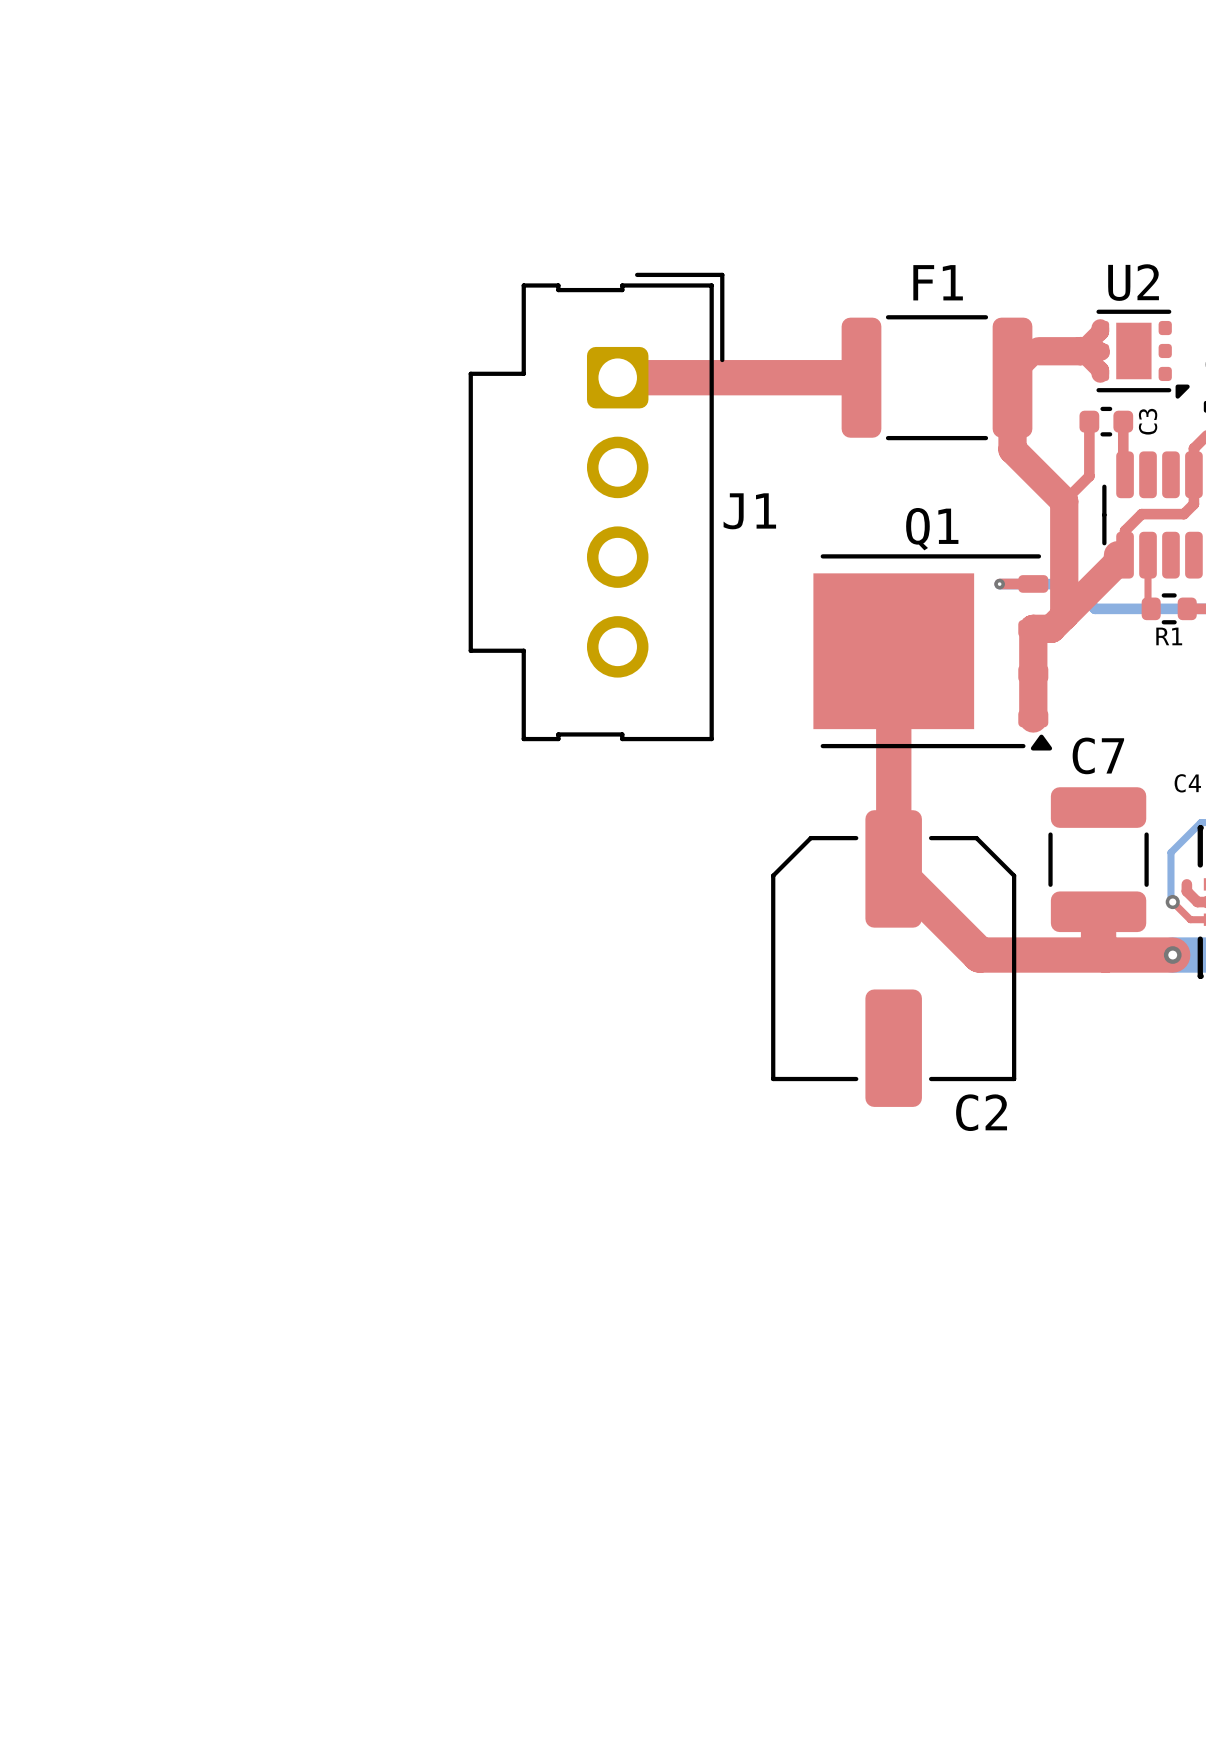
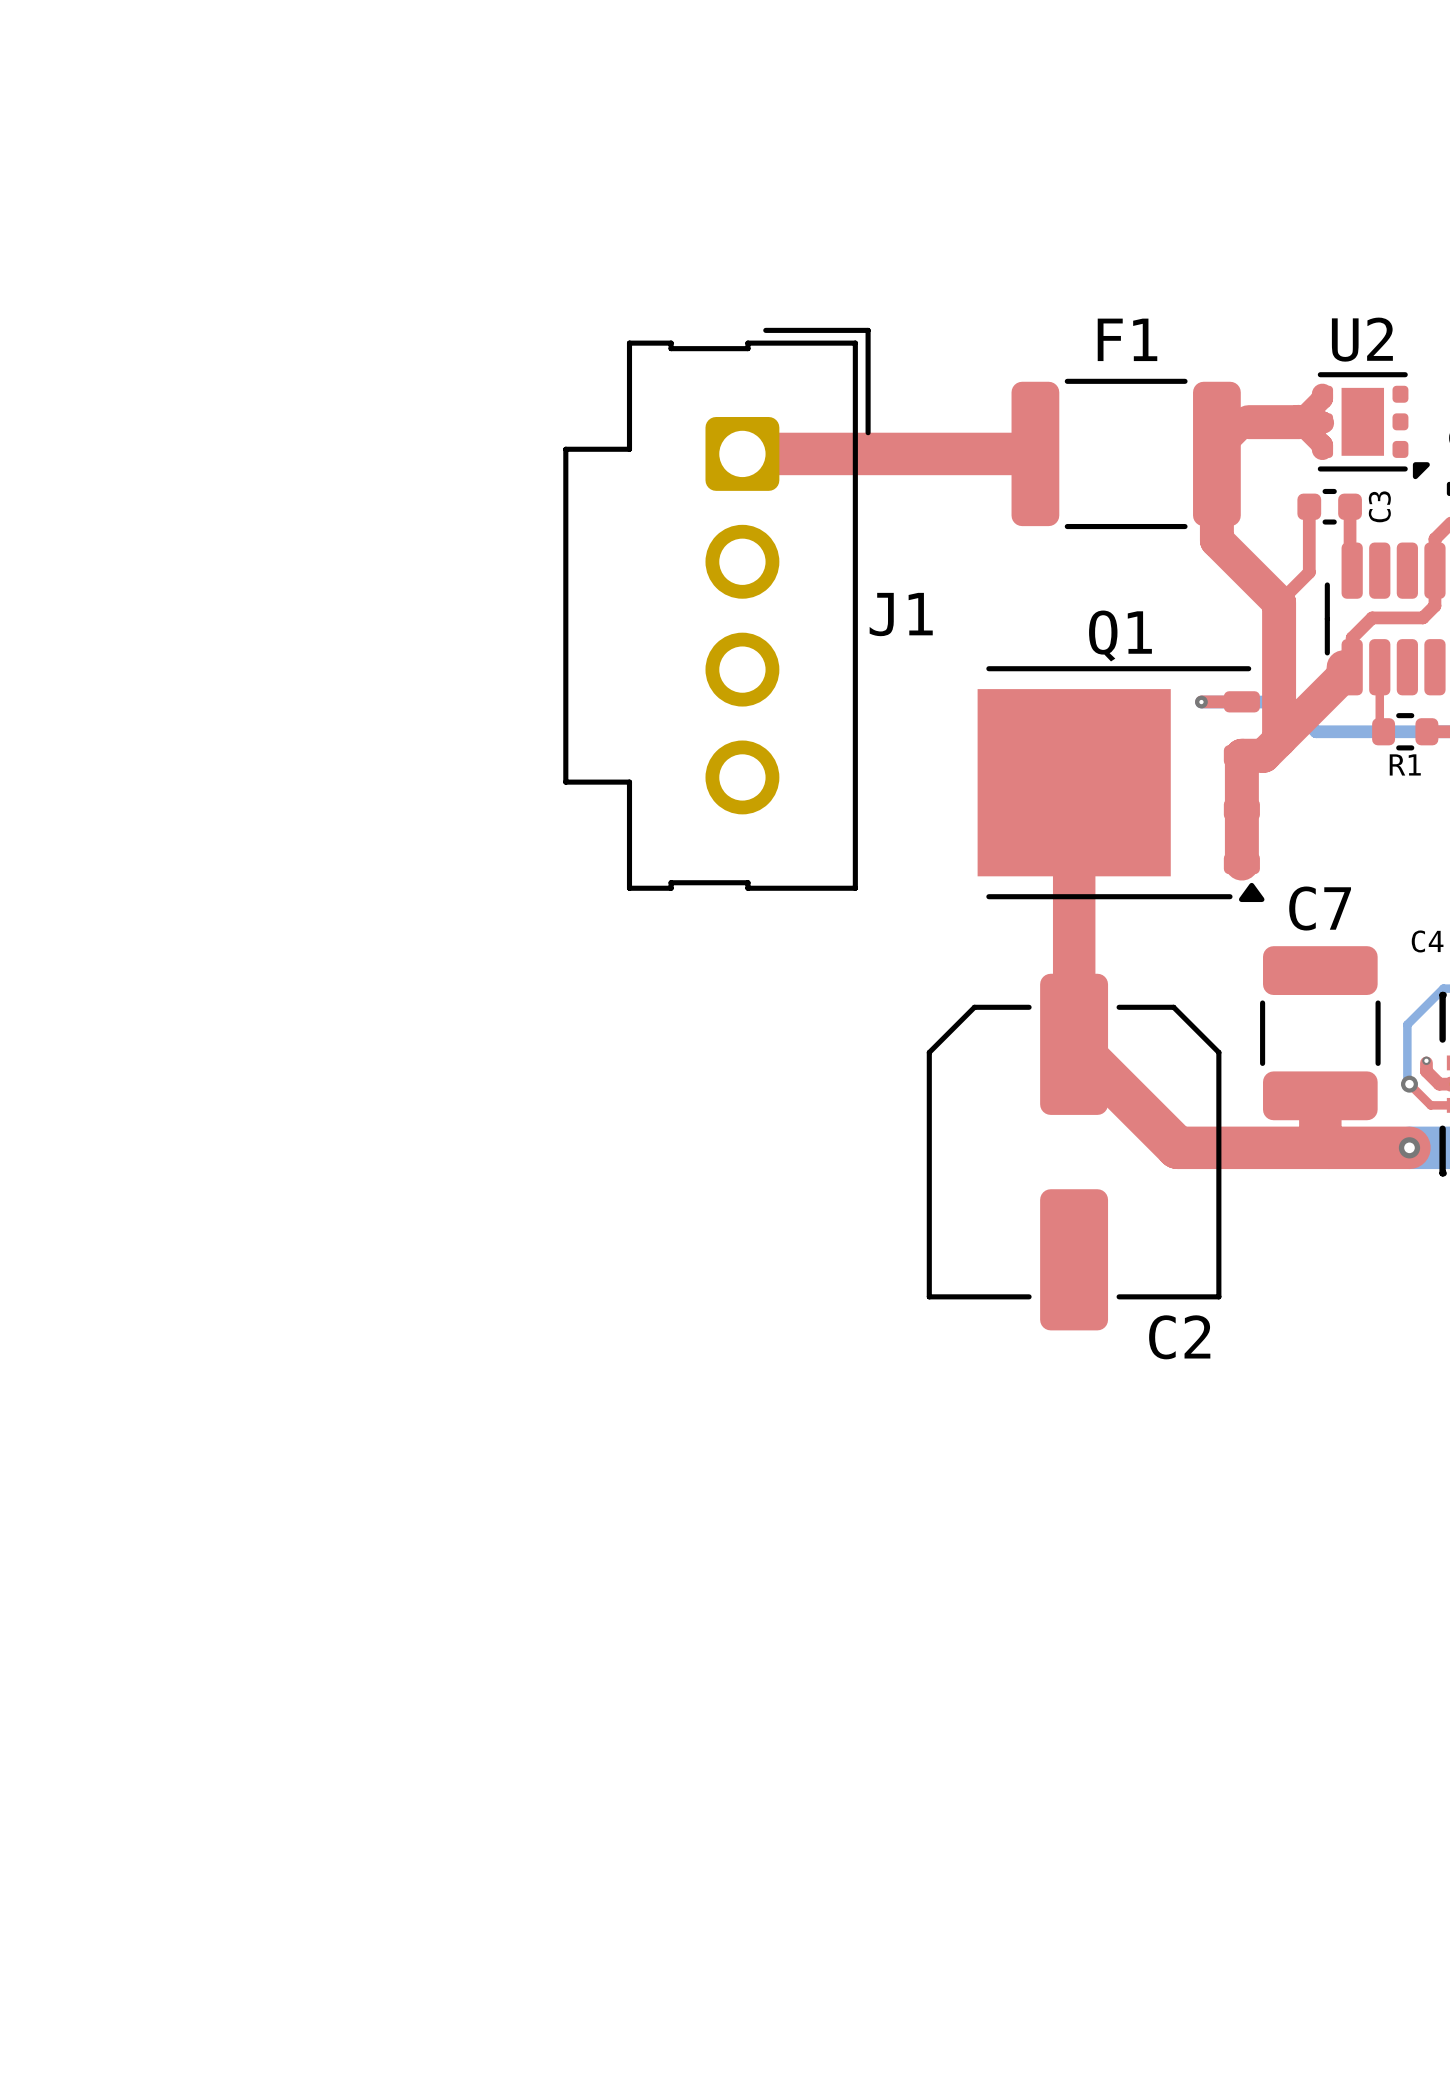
via: none -> (1426, 1060)

